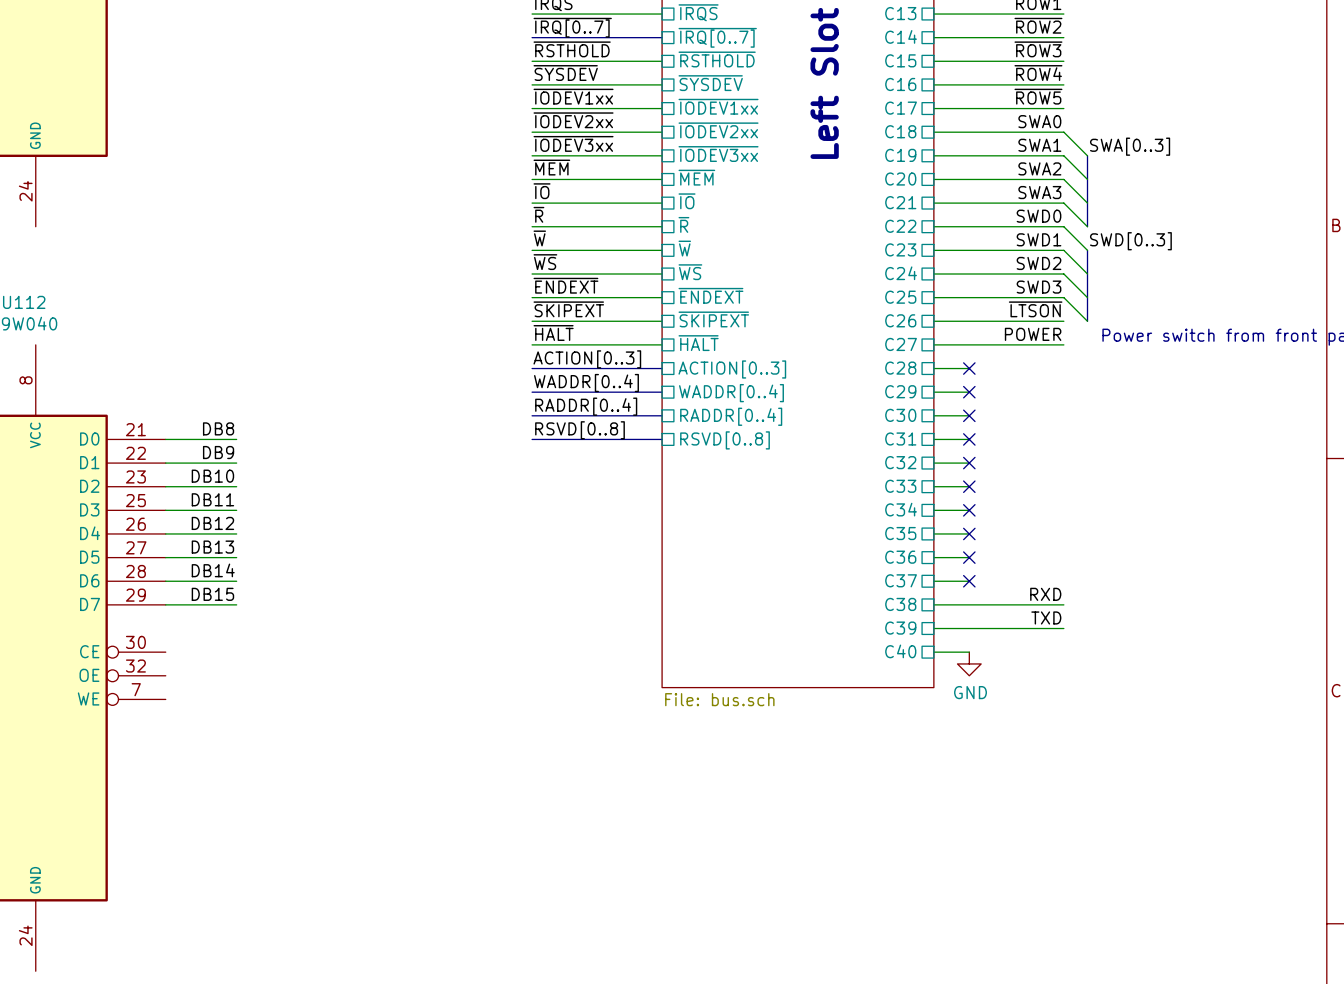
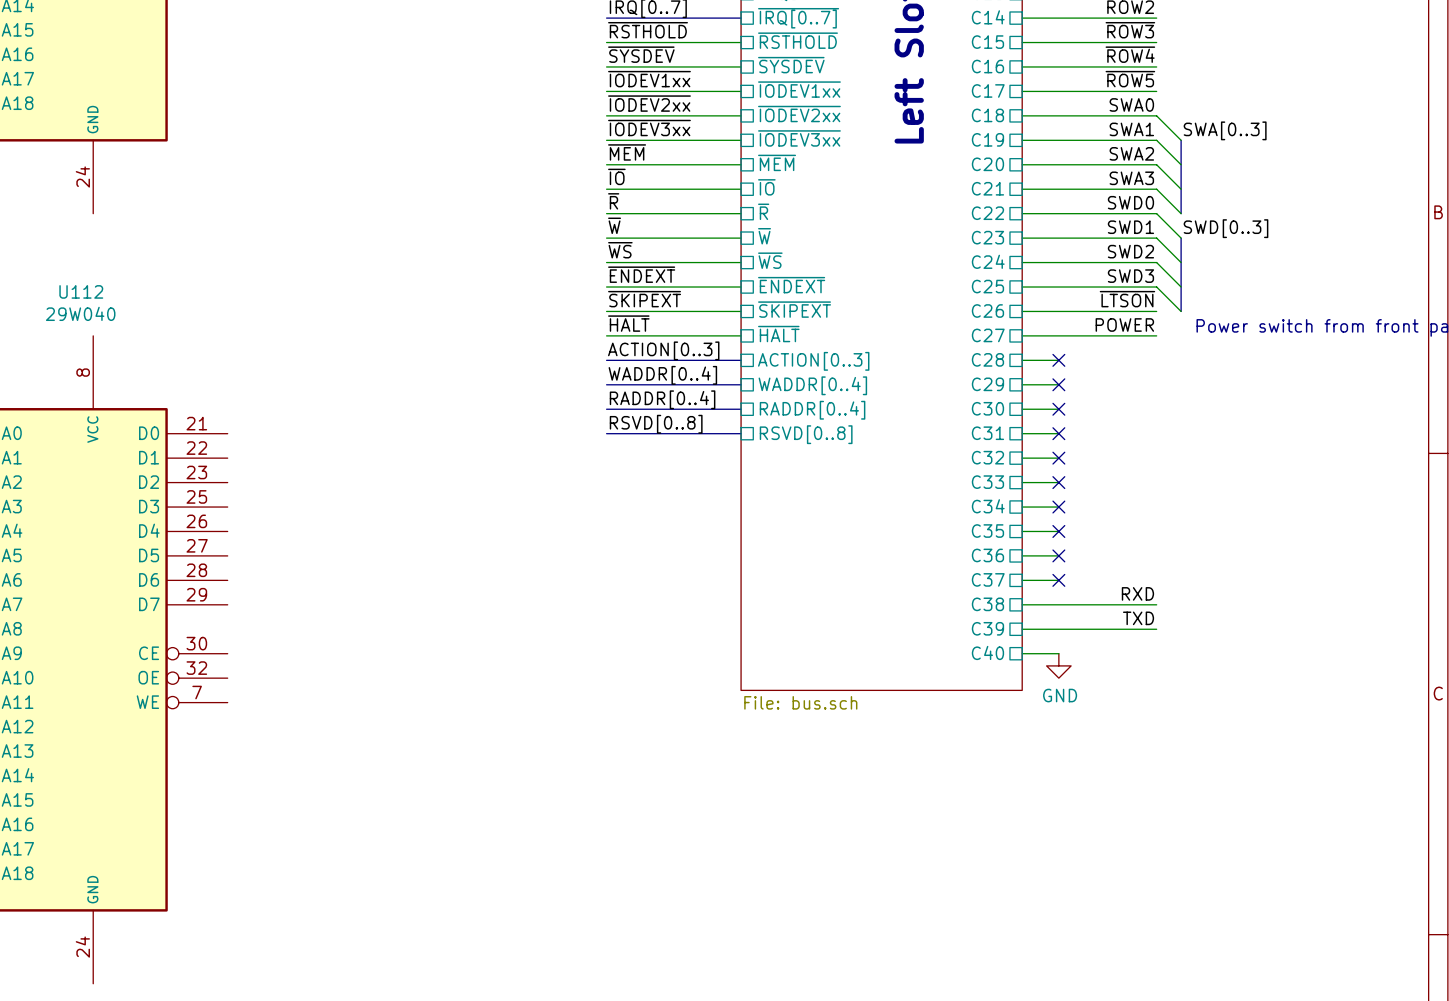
label: DB8 (218, 428) -> none
wire: (165, 439) (236, 439) -> none
label: DB9 (218, 452) -> none
wire: (165, 463) (236, 463) -> none
label: DB10 (212, 476) -> none
wire: (165, 486) (236, 486) -> none
label: DB11 (212, 499) -> none
wire: (165, 510) (236, 510) -> none
label: DB12 (212, 523) -> none
wire: (165, 533) (236, 533) -> none
label: DB13 (212, 547) -> none
wire: (165, 557) (236, 557) -> none
label: DB14 (213, 570) -> none
wire: (165, 581) (236, 581) -> none
label: DB15 (212, 594) -> none
wire: (165, 604) (236, 604) -> none

